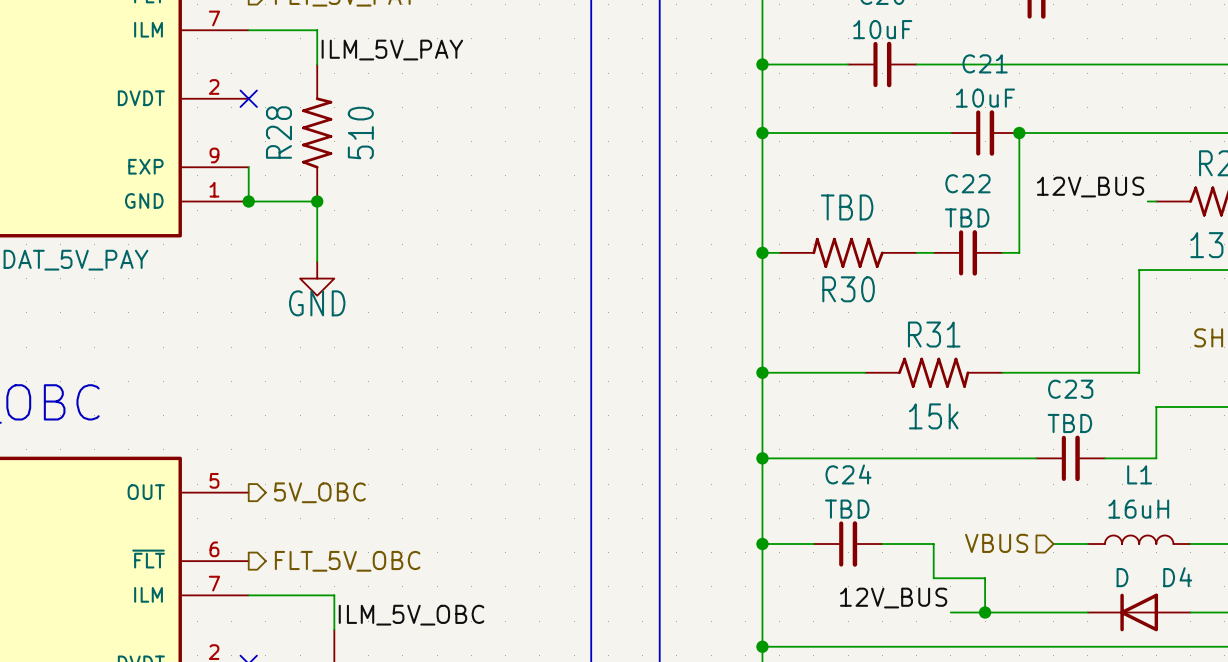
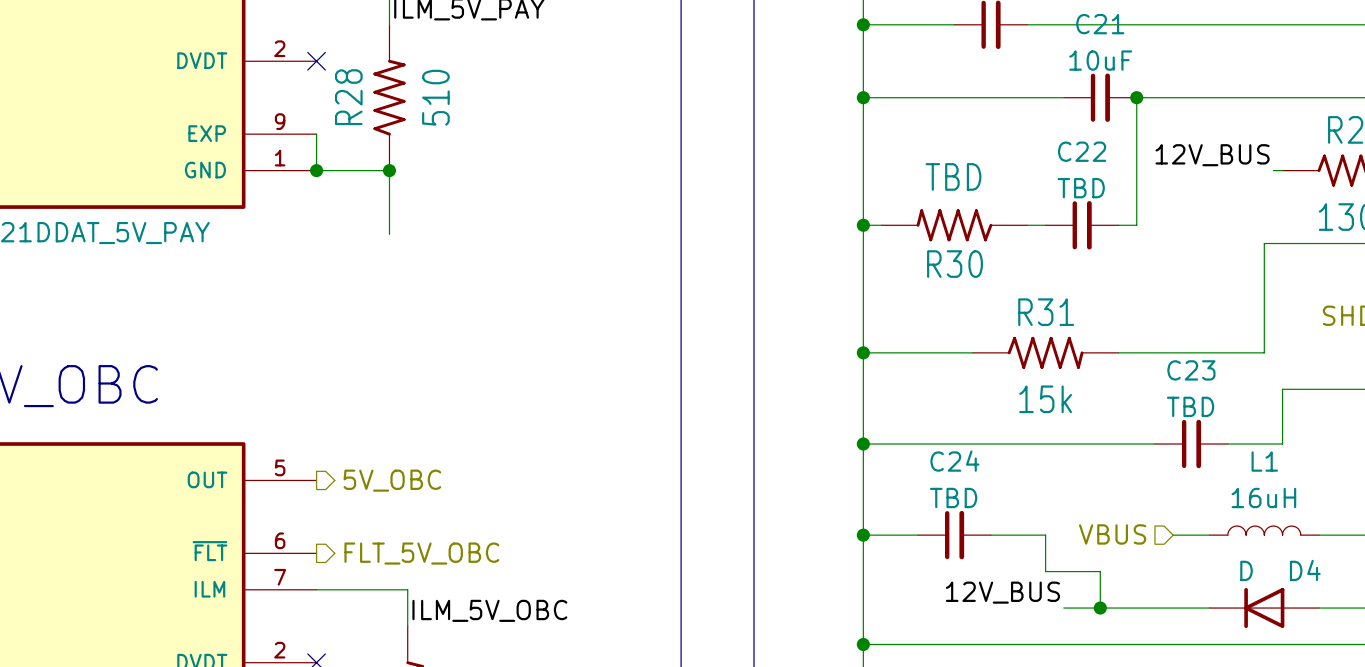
power symbol: GND (317, 278) -> none

